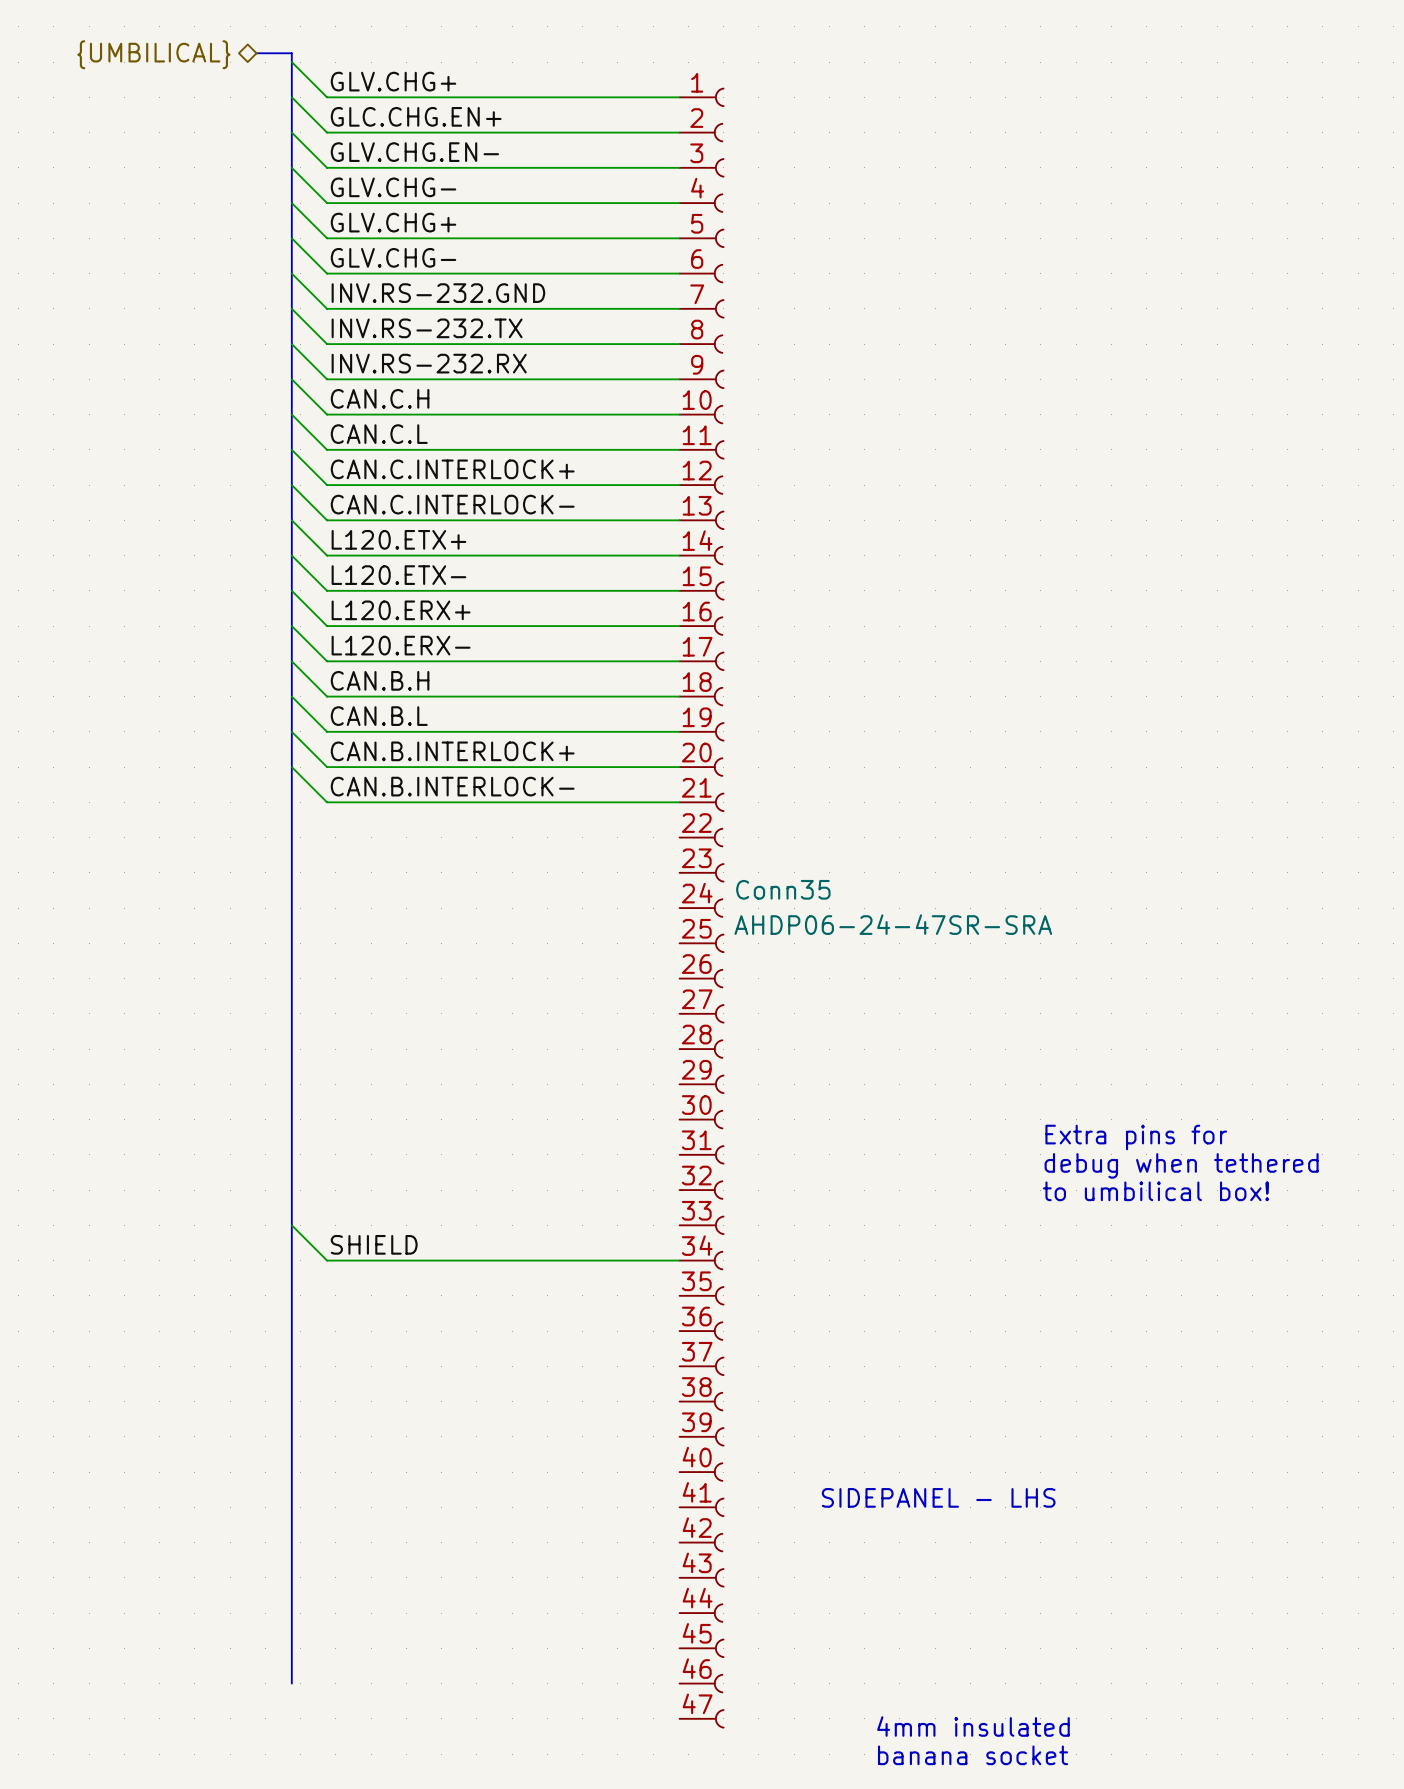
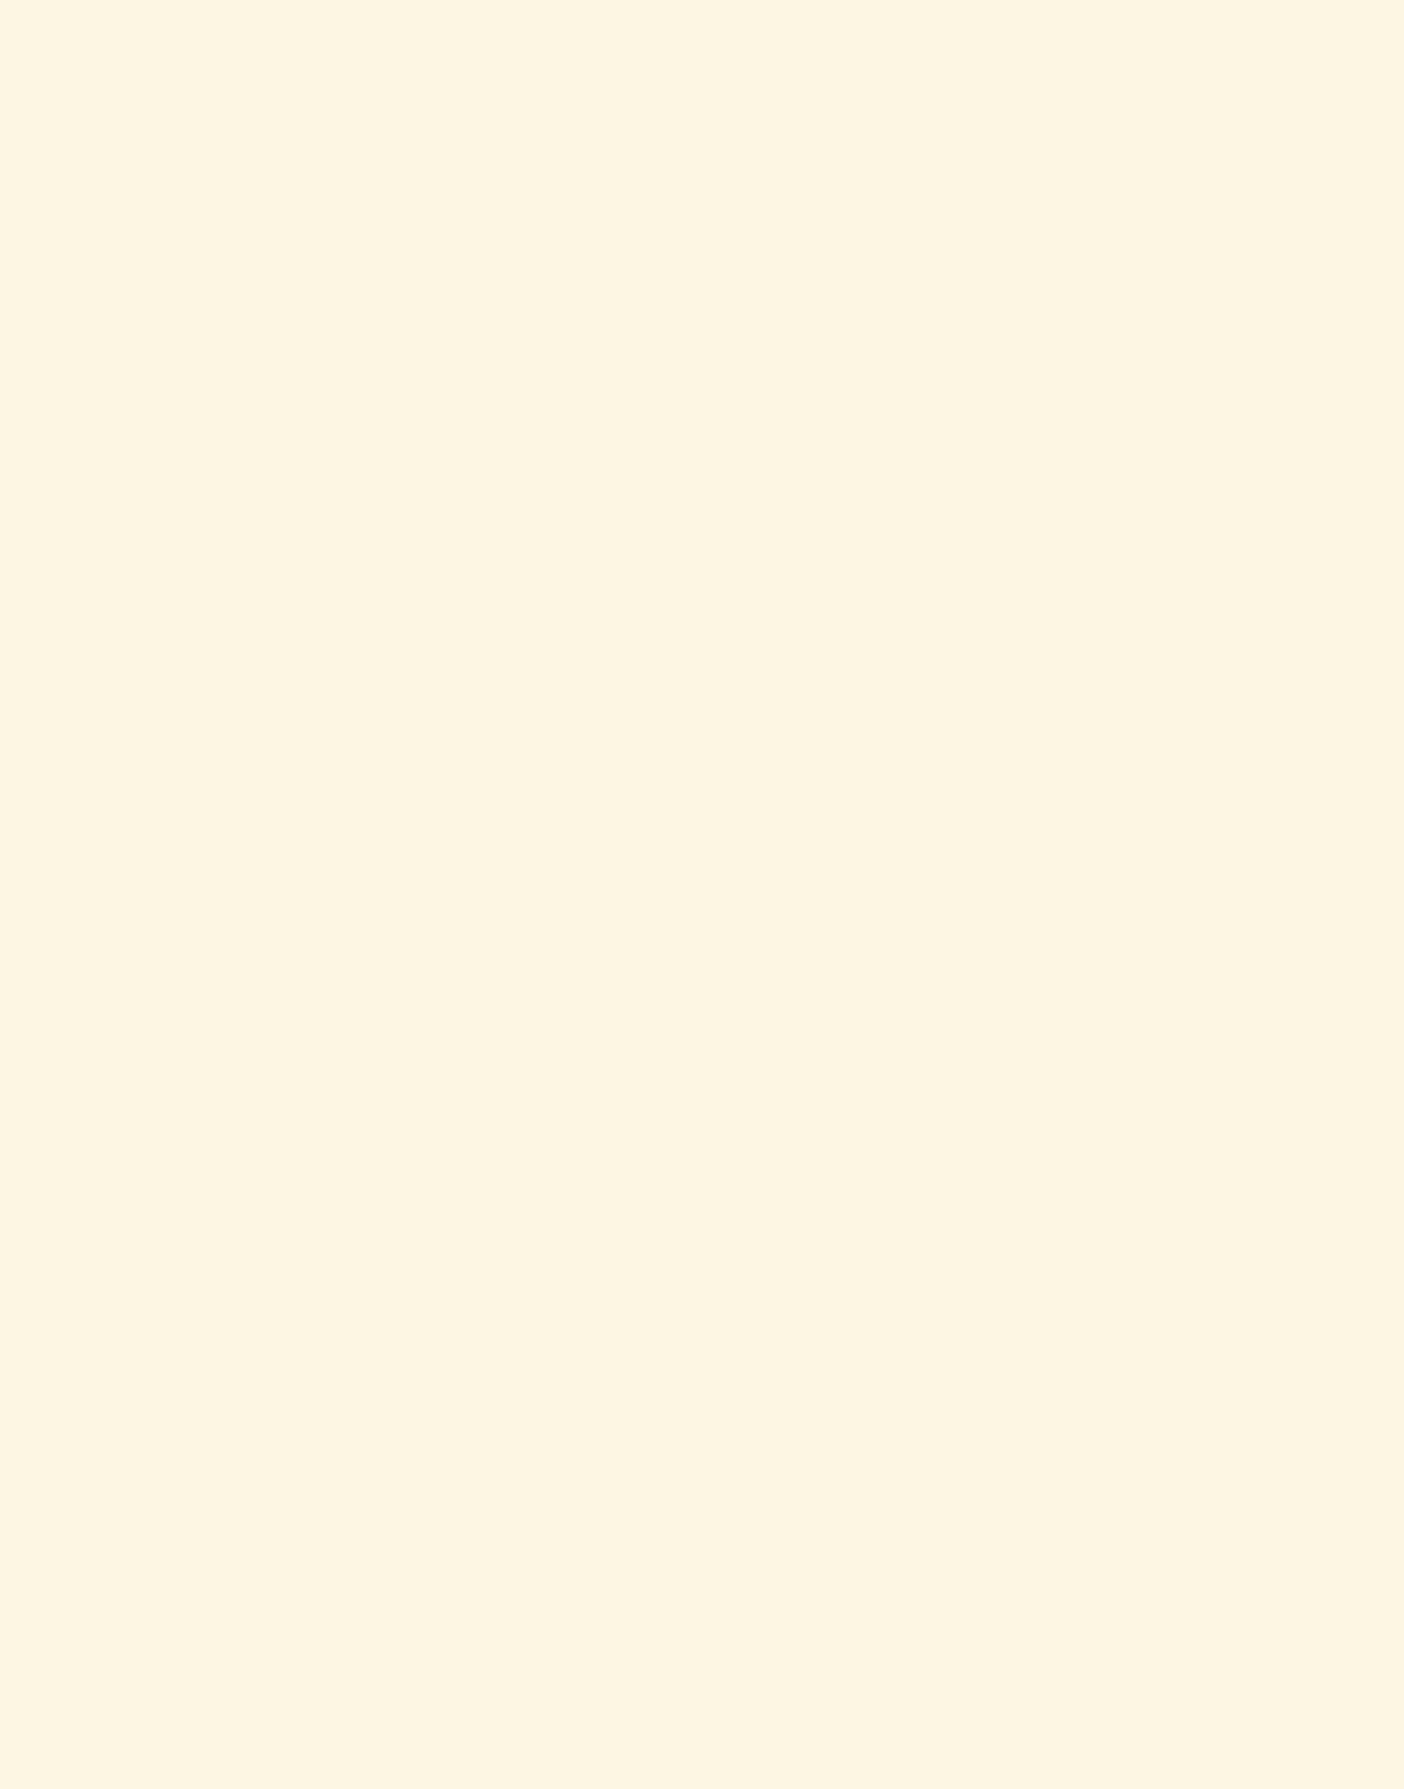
bus: (256, 53) (291, 53) (291, 1683) -> none
hierarchical label: {UMBILICAL} (153, 54) -> none
wire: (291, 62) (327, 97) (679, 97) -> none
label: GLV.CHG+ (393, 81) -> none
wire: (291, 97) (327, 132) (679, 132) -> none
label: GLC.CHG.EN+ (416, 116) -> none
wire: (291, 132) (327, 167) (679, 167) -> none
label: GLV.CHG.EN- (414, 152) -> none
wire: (291, 167) (327, 203) (679, 203) -> none
label: GLV.CHG- (393, 187) -> none
wire: (291, 203) (327, 238) (679, 238) -> none
label: GLV.CHG+ (393, 222) -> none
wire: (291, 238) (327, 273) (679, 273) -> none
label: GLV.CHG- (393, 257) -> none
wire: (291, 273) (327, 308) (679, 308) -> none
label: INV.RS-232.GND (438, 293) -> none
wire: (291, 308) (327, 344) (679, 344) -> none
label: INV.RS-232.TX (427, 328) -> none
wire: (291, 344) (327, 379) (679, 379) -> none
label: INV.RS-232.RX (429, 363) -> none
wire: (291, 379) (327, 414) (679, 414) -> none
label: CAN.C.H (380, 398) -> none
wire: (291, 414) (327, 449) (679, 449) -> none
label: CAN.C.L (379, 434) -> none
wire: (291, 449) (327, 485) (679, 485) -> none
label: CAN.C.INTERLOCK+ (452, 469) -> none
wire: (291, 485) (327, 520) (679, 520) -> none
label: CAN.C.INTERLOCK- (452, 504) -> none
wire: (291, 520) (327, 555) (679, 555) -> none
label: L120.ETX+ (398, 539) -> none
wire: (291, 555) (327, 590) (679, 590) -> none
label: L120.ETX- (398, 575) -> none
wire: (291, 590) (327, 626) (679, 626) -> none
label: L120.ERX+ (401, 610) -> none
wire: (291, 626) (327, 661) (679, 661) -> none
label: L120.ERX- (401, 645) -> none
wire: (291, 661) (327, 696) (679, 696) -> none
label: CAN.B.H (380, 680) -> none
wire: (291, 696) (327, 731) (679, 731) -> none
label: CAN.B.L (379, 716) -> none
wire: (291, 731) (327, 767) (679, 767) -> none
label: CAN.B.INTERLOCK+ (452, 751) -> none
wire: (291, 767) (327, 802) (679, 802) -> none
label: CAN.B.INTERLOCK- (452, 786) -> none
Conn35: (701, 908) -> none
text: Extra pins for (1136, 1137) -> none
text: debug when tethered (1181, 1165) -> none
text: to umbilical box! (1155, 1191) -> none
wire: (291, 1225) (327, 1260) (679, 1260) -> none
label: SHIELD (374, 1244) -> none
text: SIDEPANEL - LHS (938, 1497) -> none
text: 4mm insulated (973, 1726) -> none
text: banana socket (973, 1755) -> none

